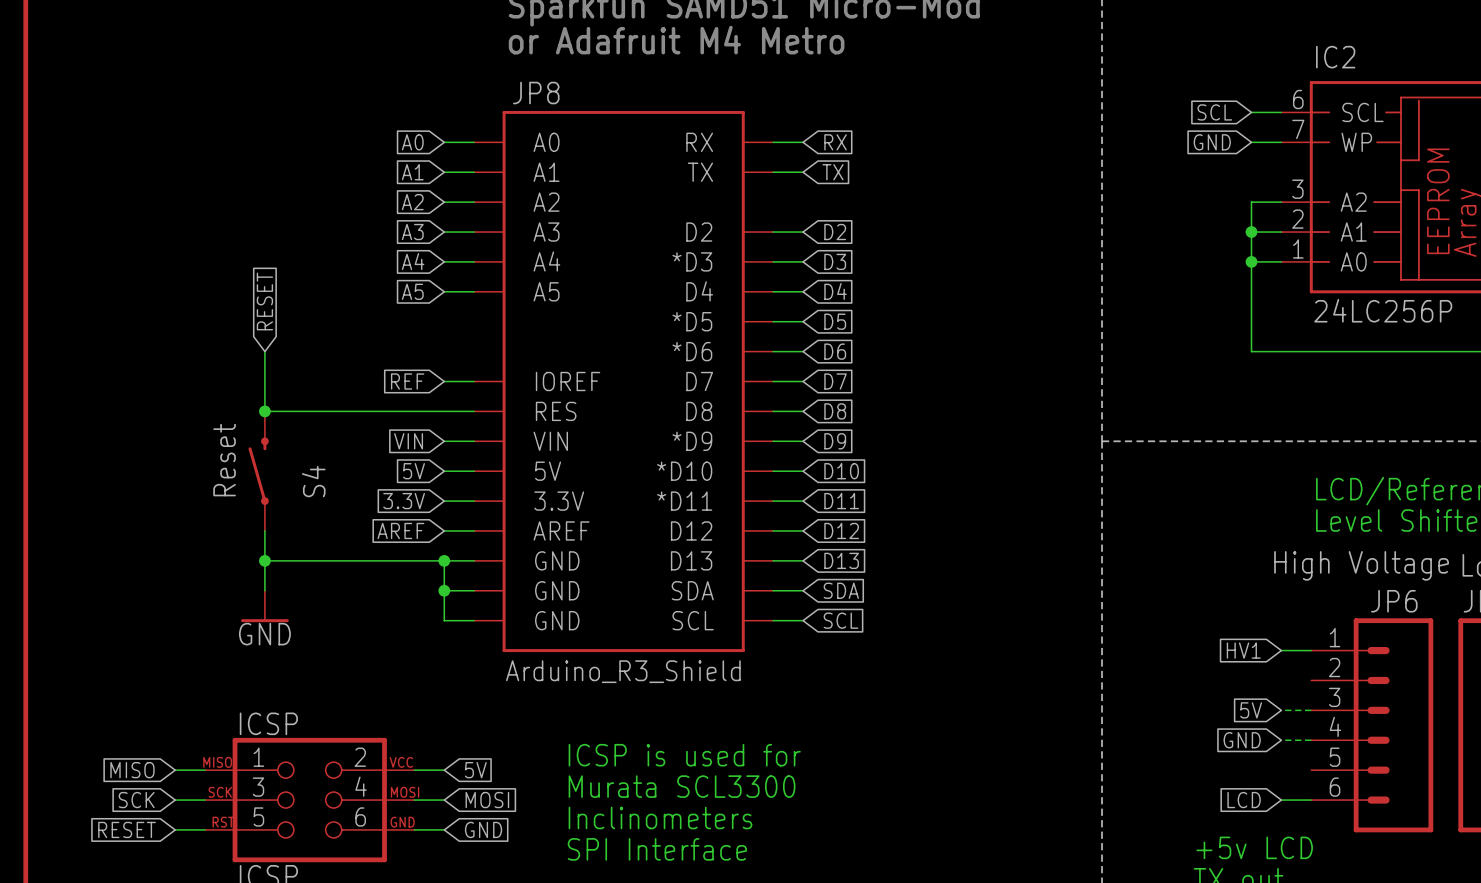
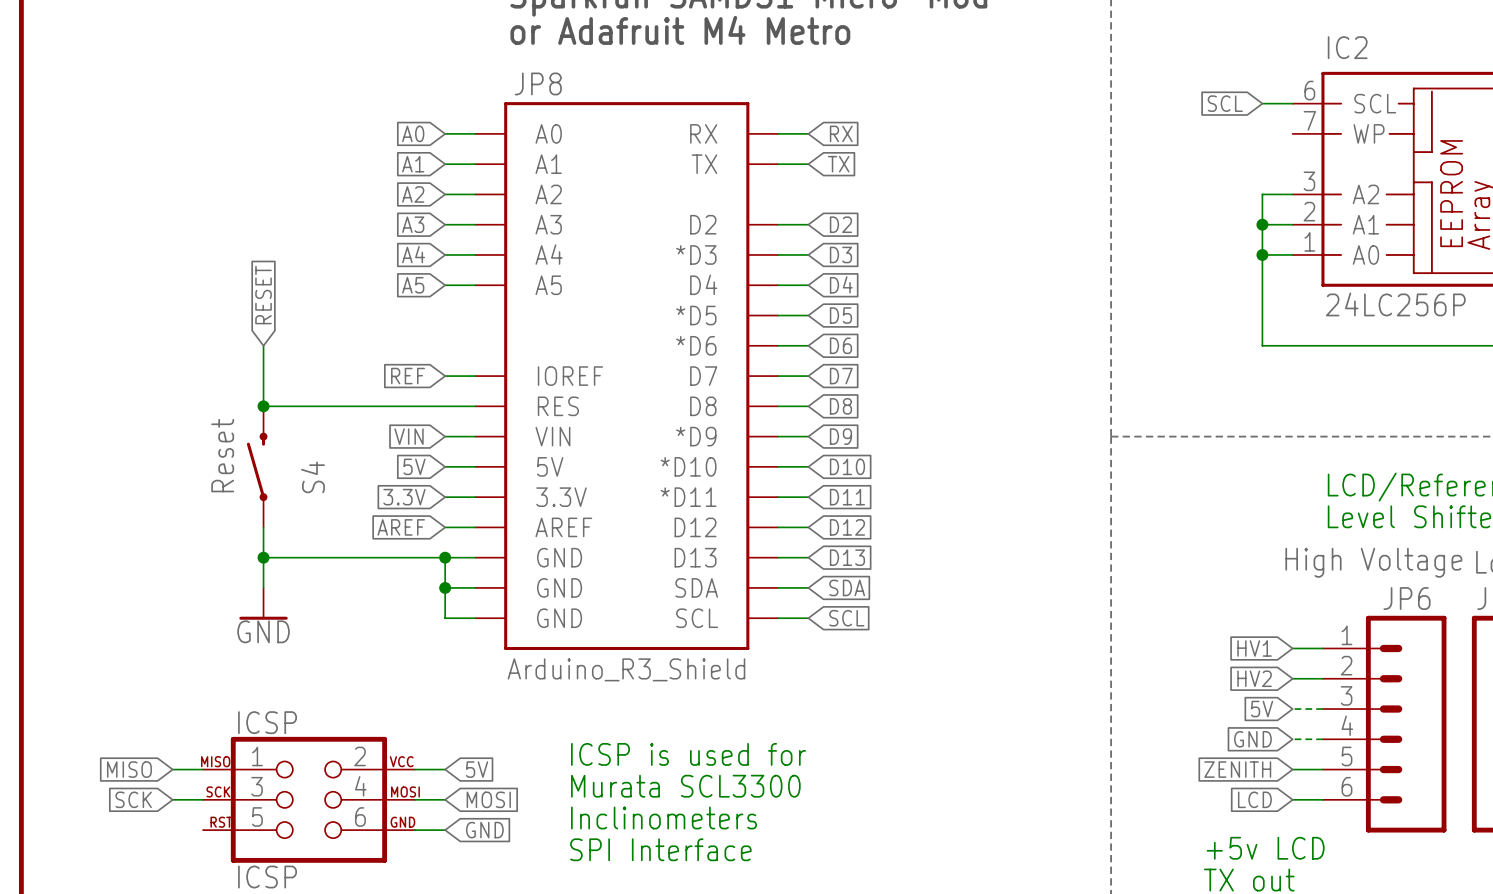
global label: GND (1212, 142) -> none
wire: (1251, 142) (1281, 142) -> none
global label: none -> HV2 (1254, 678)
wire: none -> (1292, 678) (1322, 678)
global label: none -> ZENITH (1237, 769)
wire: none -> (1292, 769) (1322, 769)
global label: RESET (127, 829) -> none
wire: (175, 829) (205, 829) -> none

